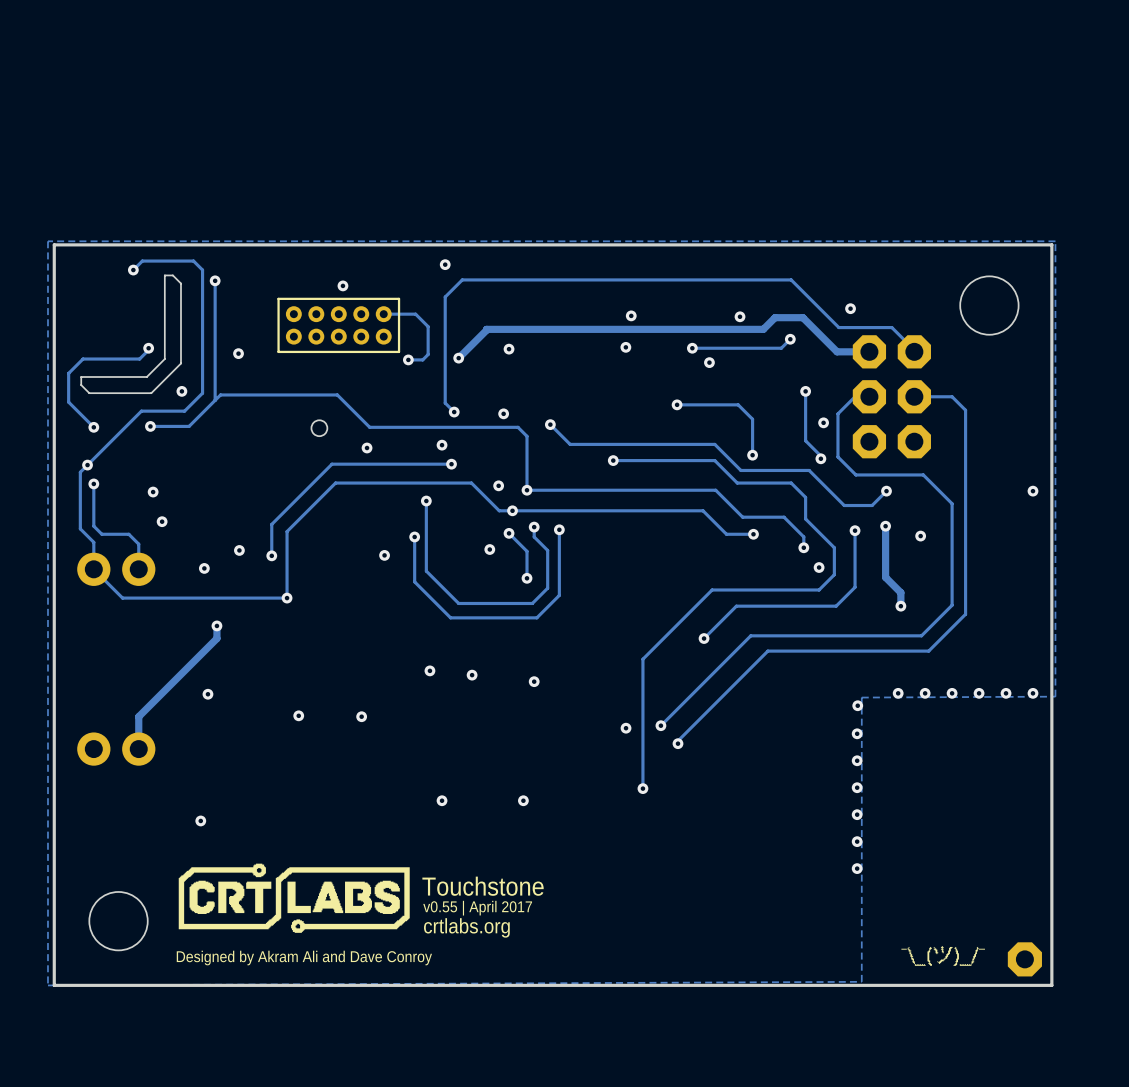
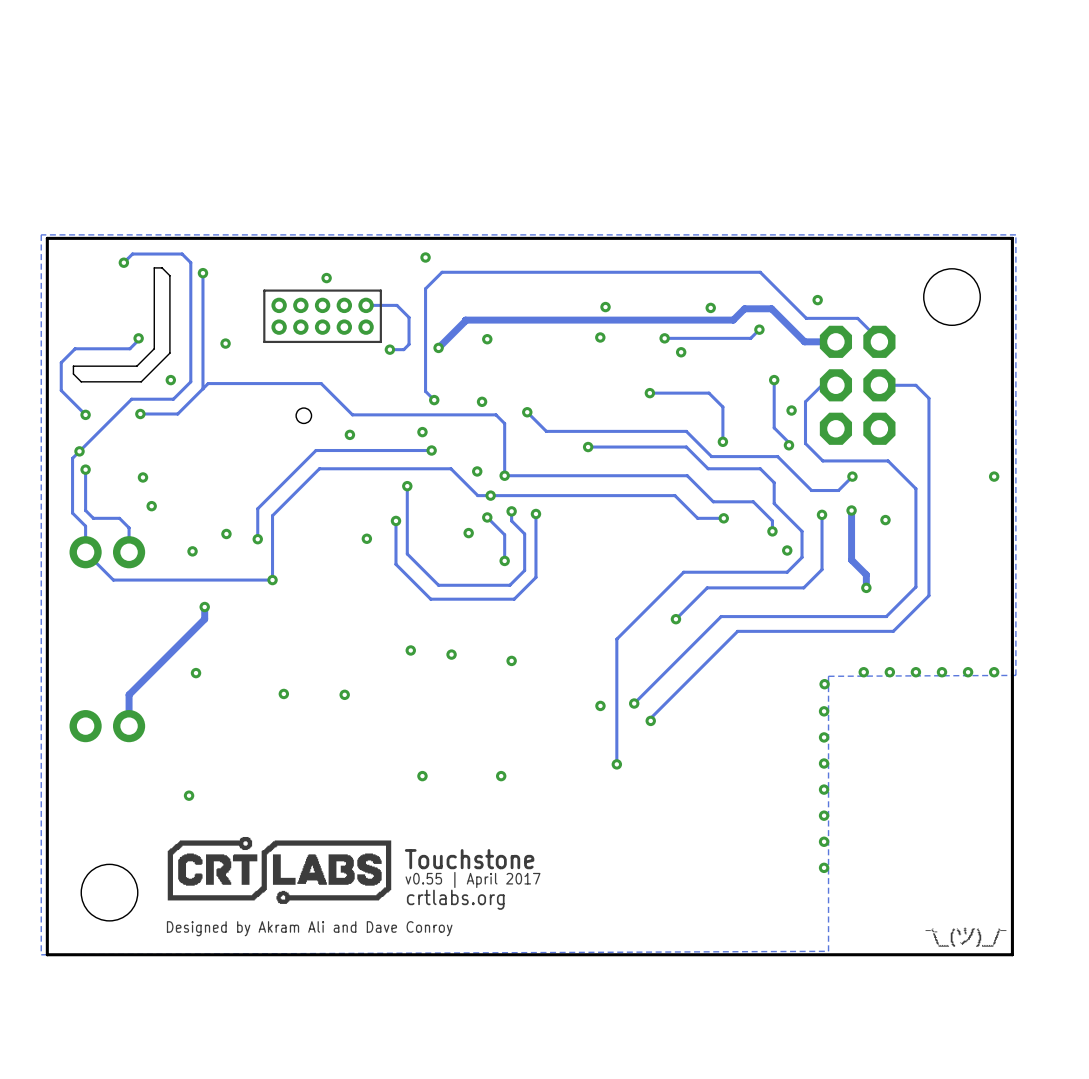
via: none -> (824, 867)
drawing: [907, 946, 979, 966] -> none
drawing position: (904, 949) -> (928, 930)
drawing position: (981, 949) -> (1003, 930)
drawing: none -> [931, 927, 1001, 947]
part: (1024, 959) -> none
drawing position: (920, 965) -> (943, 946)
drawing position: (965, 965) -> (987, 946)

